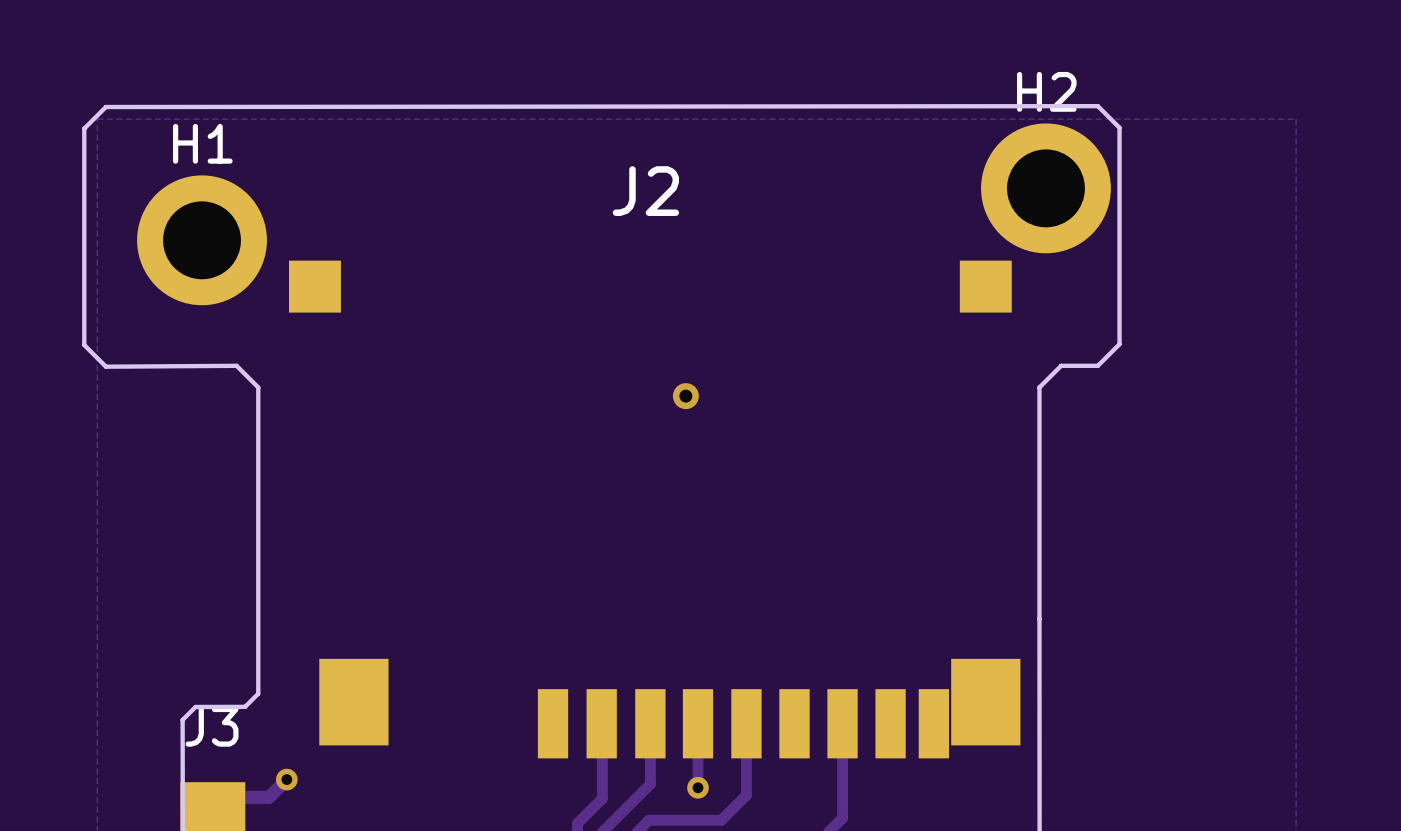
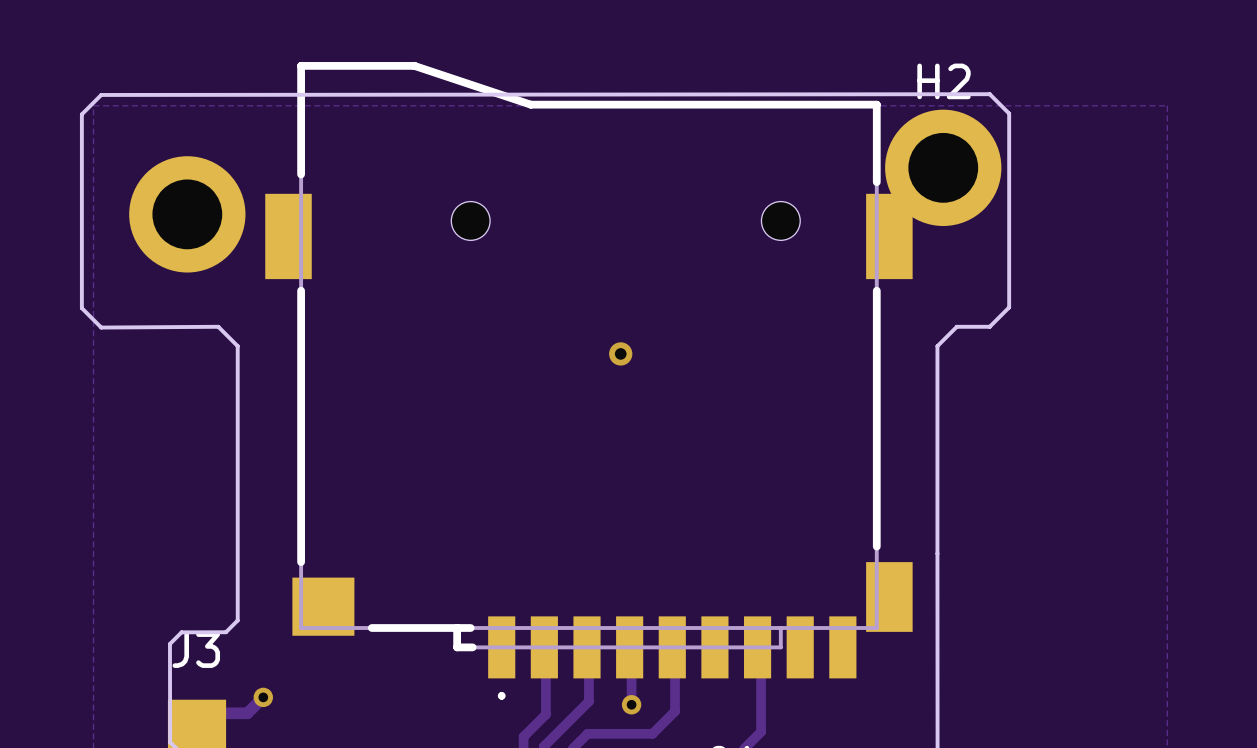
H1 name: H1 (202, 143) -> none
part: none -> (588, 380)
J2: (654, 509) -> none

